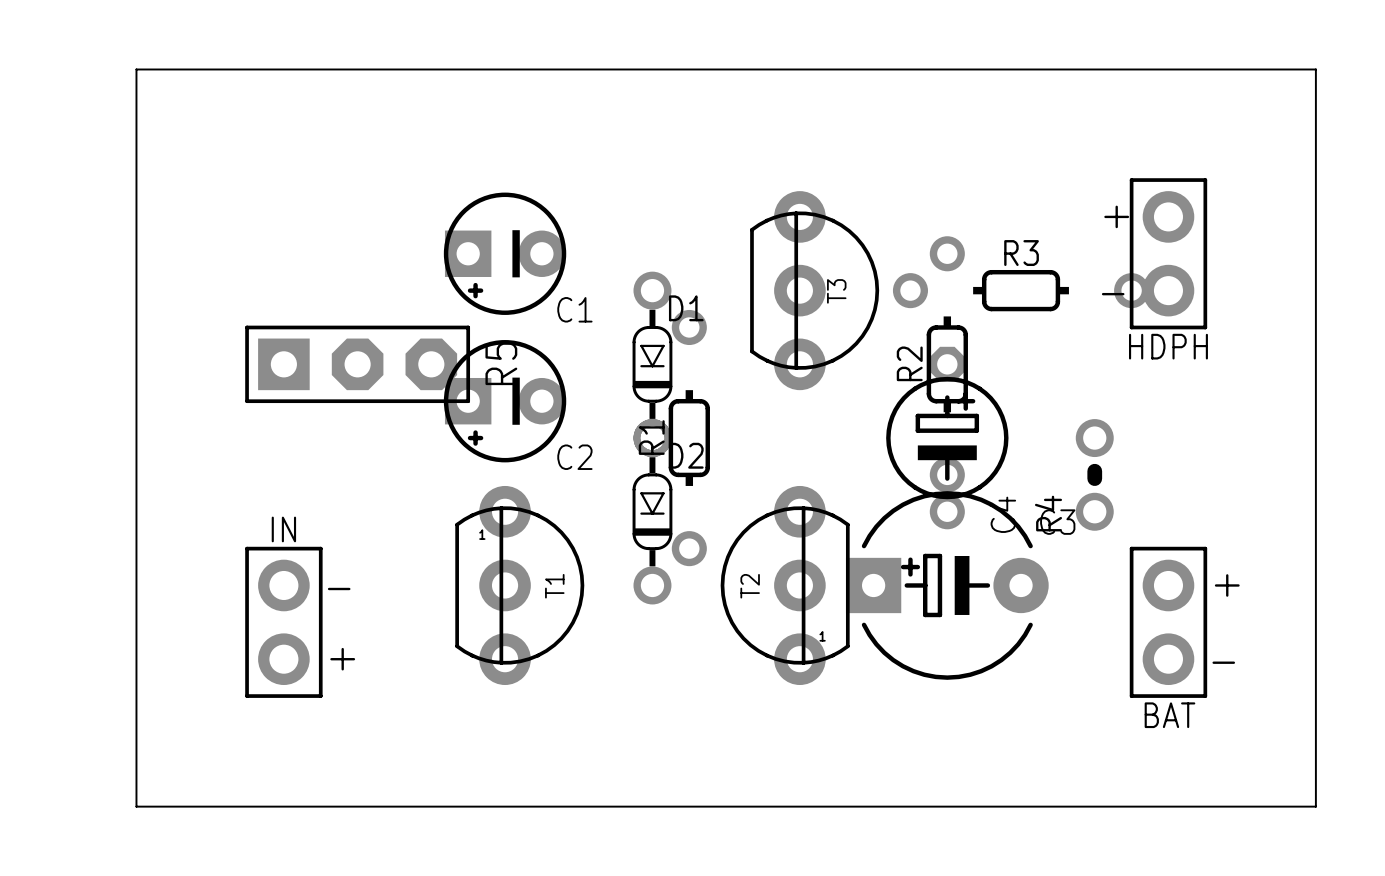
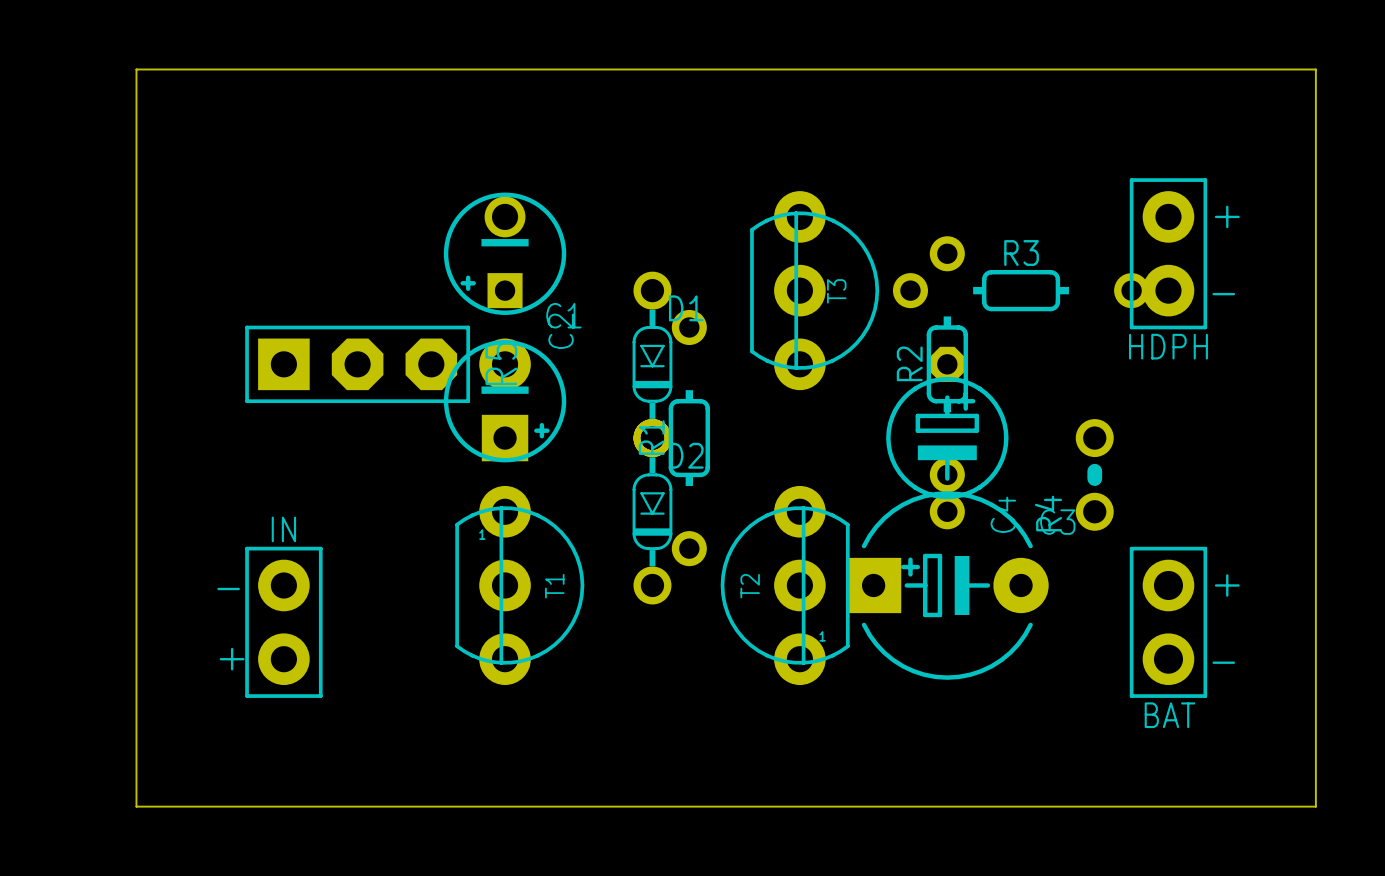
HDPH footprint: [1129, 178, 1208, 330] -> [1129, 178, 1208, 330]
C1 footprint: [443, 192, 567, 315] -> [443, 192, 567, 315]
C2 footprint: [443, 340, 567, 463] -> [443, 338, 567, 463]
C2 name position: C2 (574, 457) -> C2 (561, 331)
IN footprint: [245, 546, 323, 698] -> [245, 546, 323, 698]

